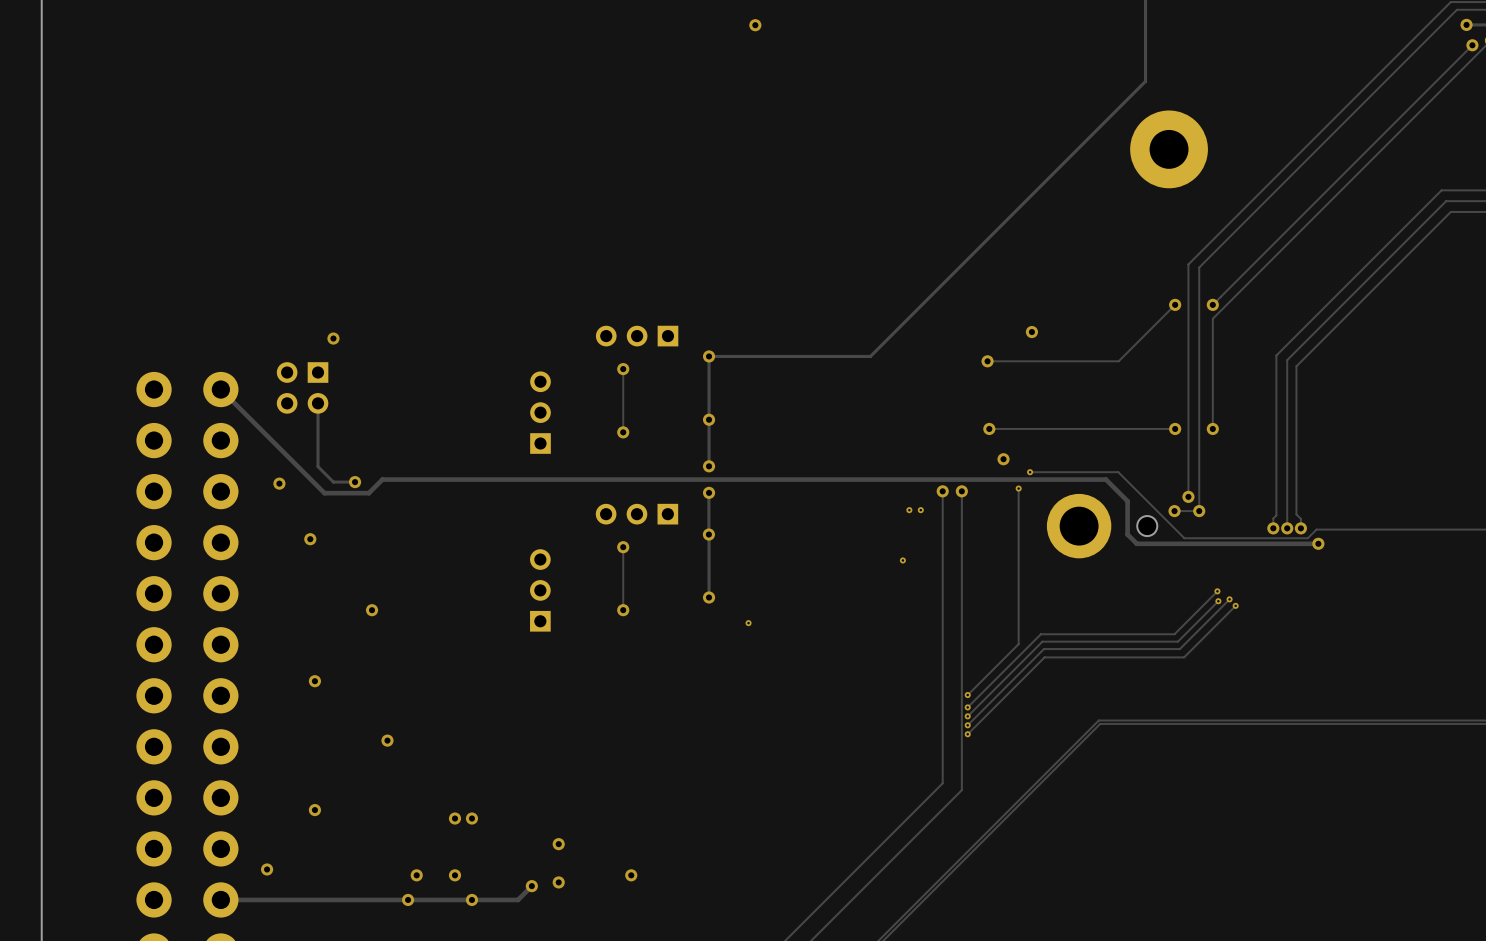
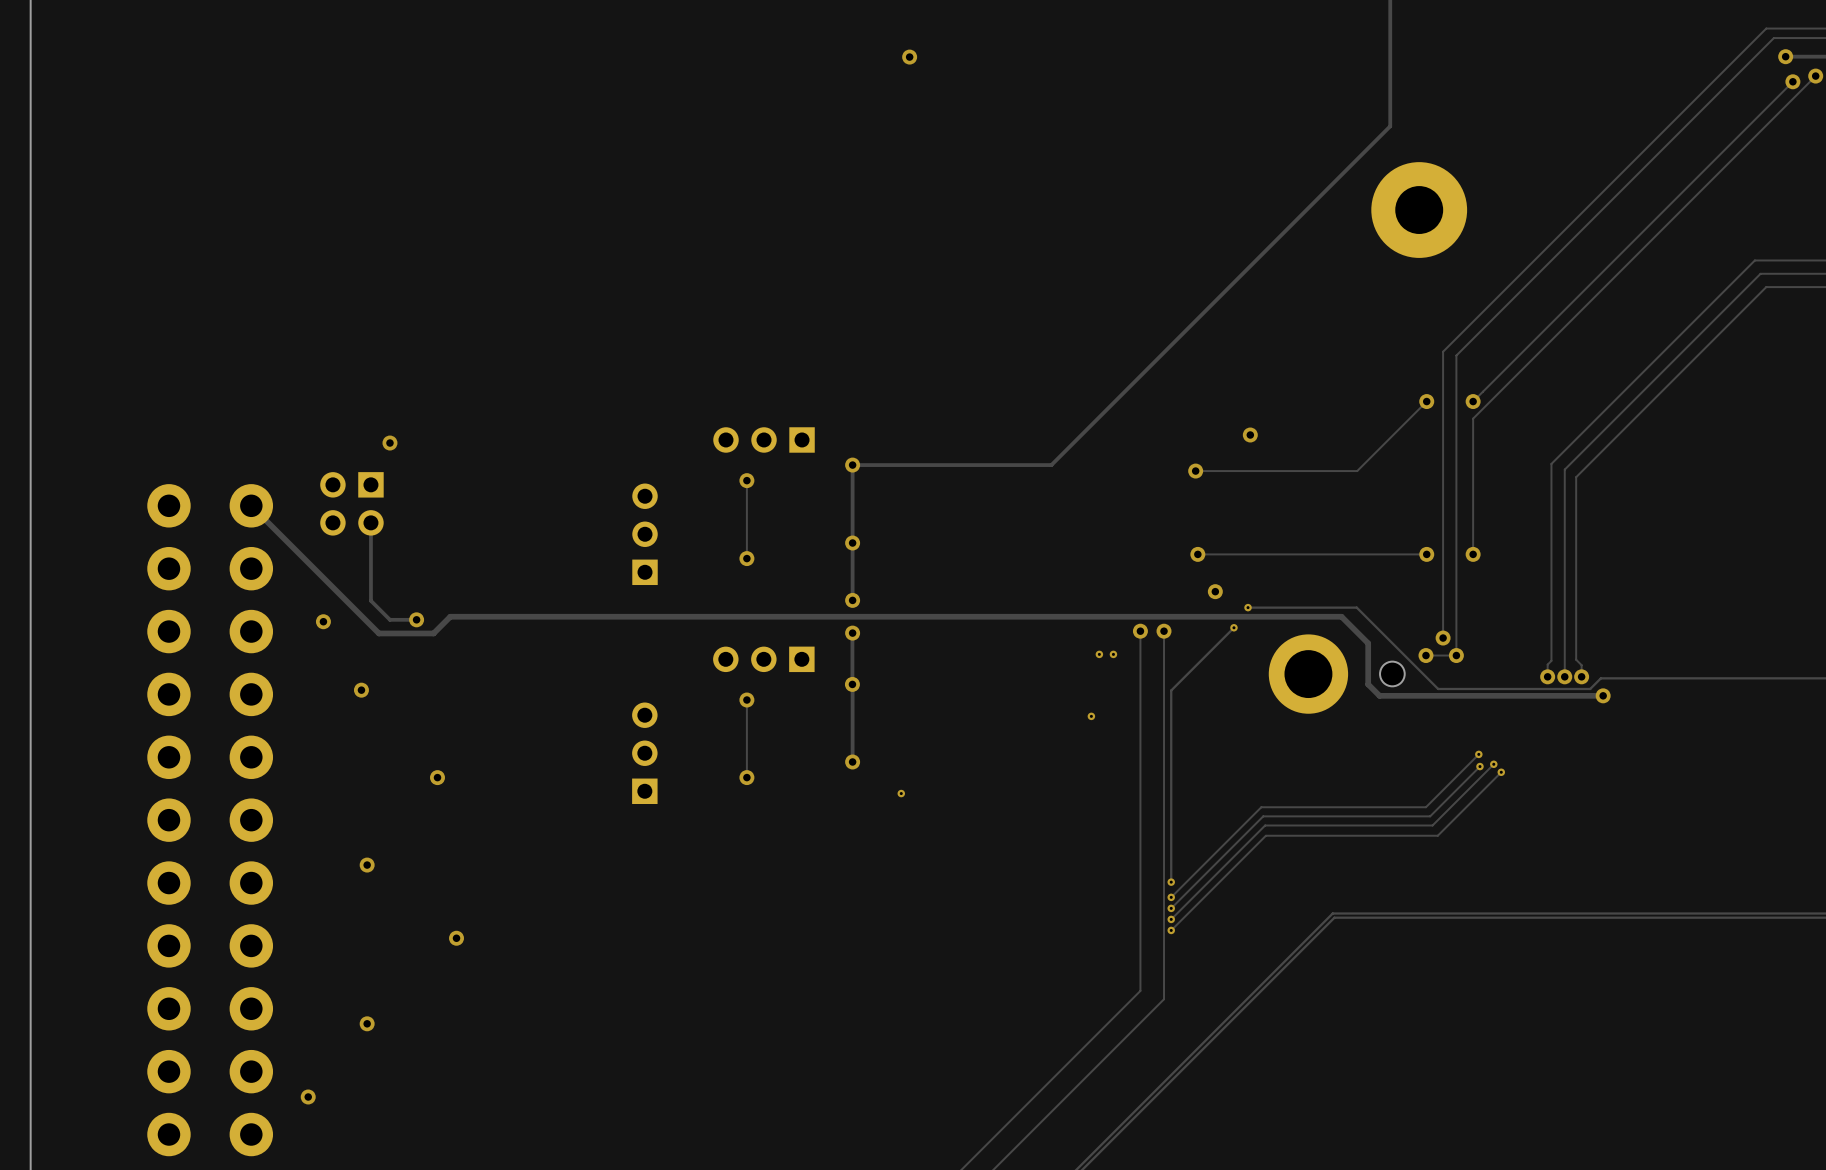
track: (1018, 488) (1018, 644) (967, 695) -> (1233, 627) (1171, 690) (1171, 882)
via: (454, 818) -> none
via: (471, 818) -> none
via: (558, 844) -> none
via: (416, 875) -> none
via: (454, 875) -> none
via: (631, 875) -> none
via: (558, 882) -> none
track: (531, 886) (518, 899) (220, 899) -> none
via: (531, 886) -> none
via: (408, 899) -> none
via: (471, 899) -> none

